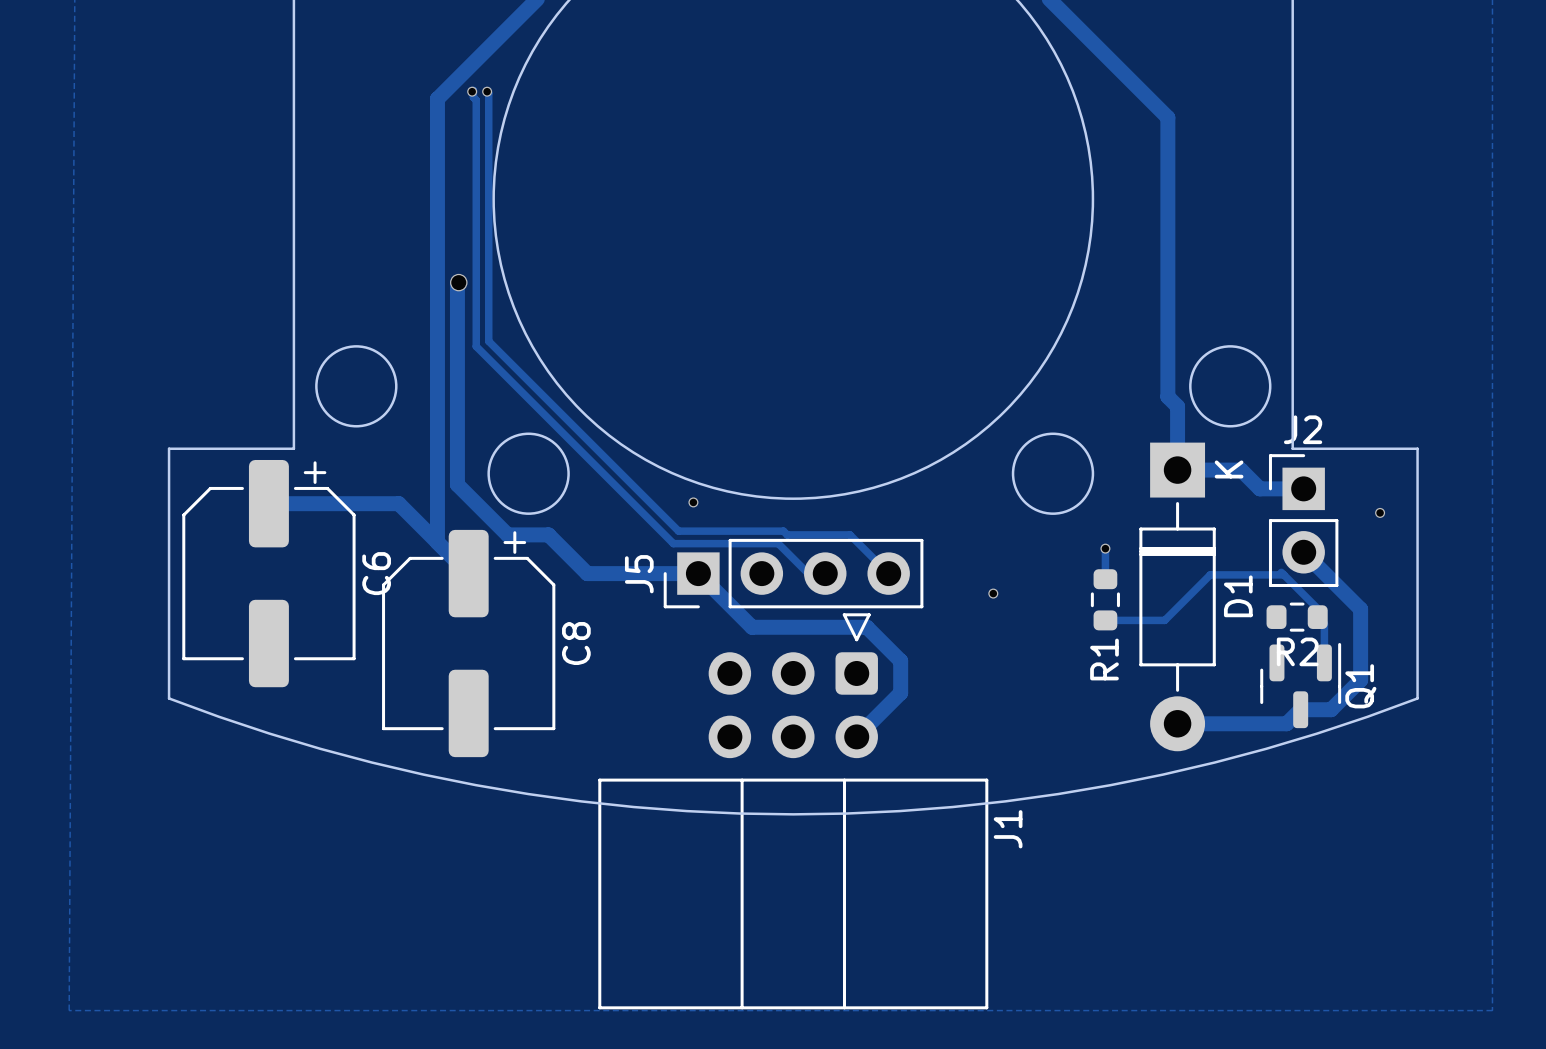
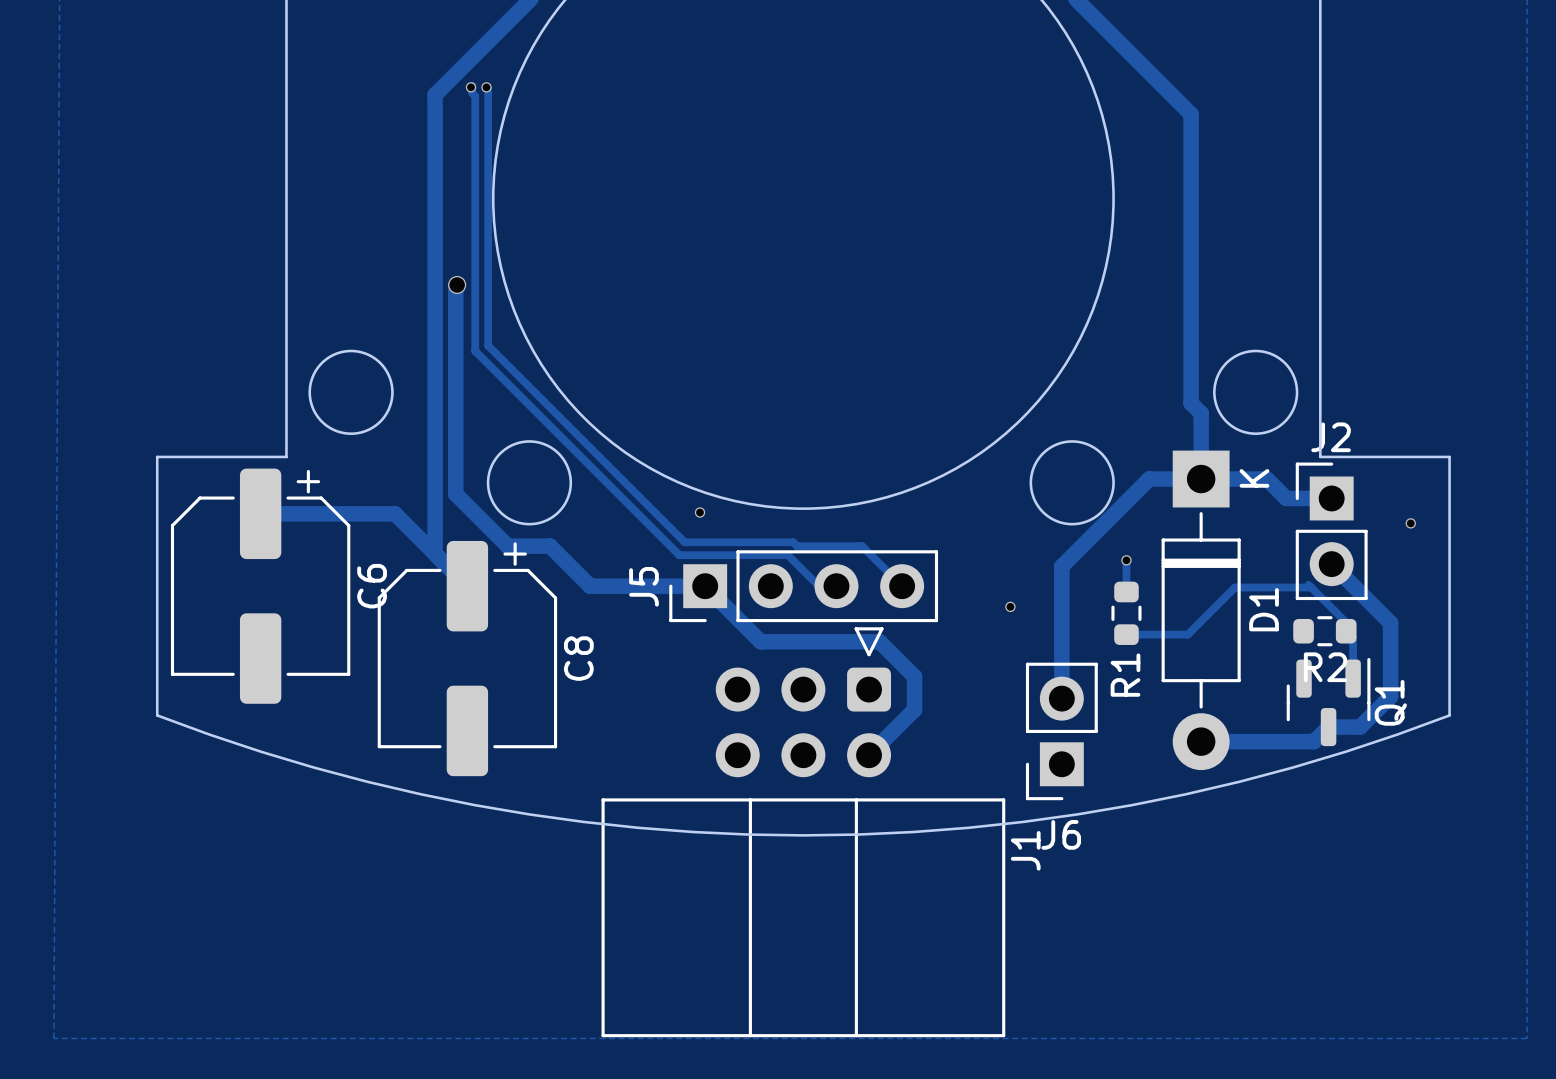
track: none -> (1201, 479) (1149, 479) (1061, 566) (1061, 698)
J6: none -> (1061, 731)

